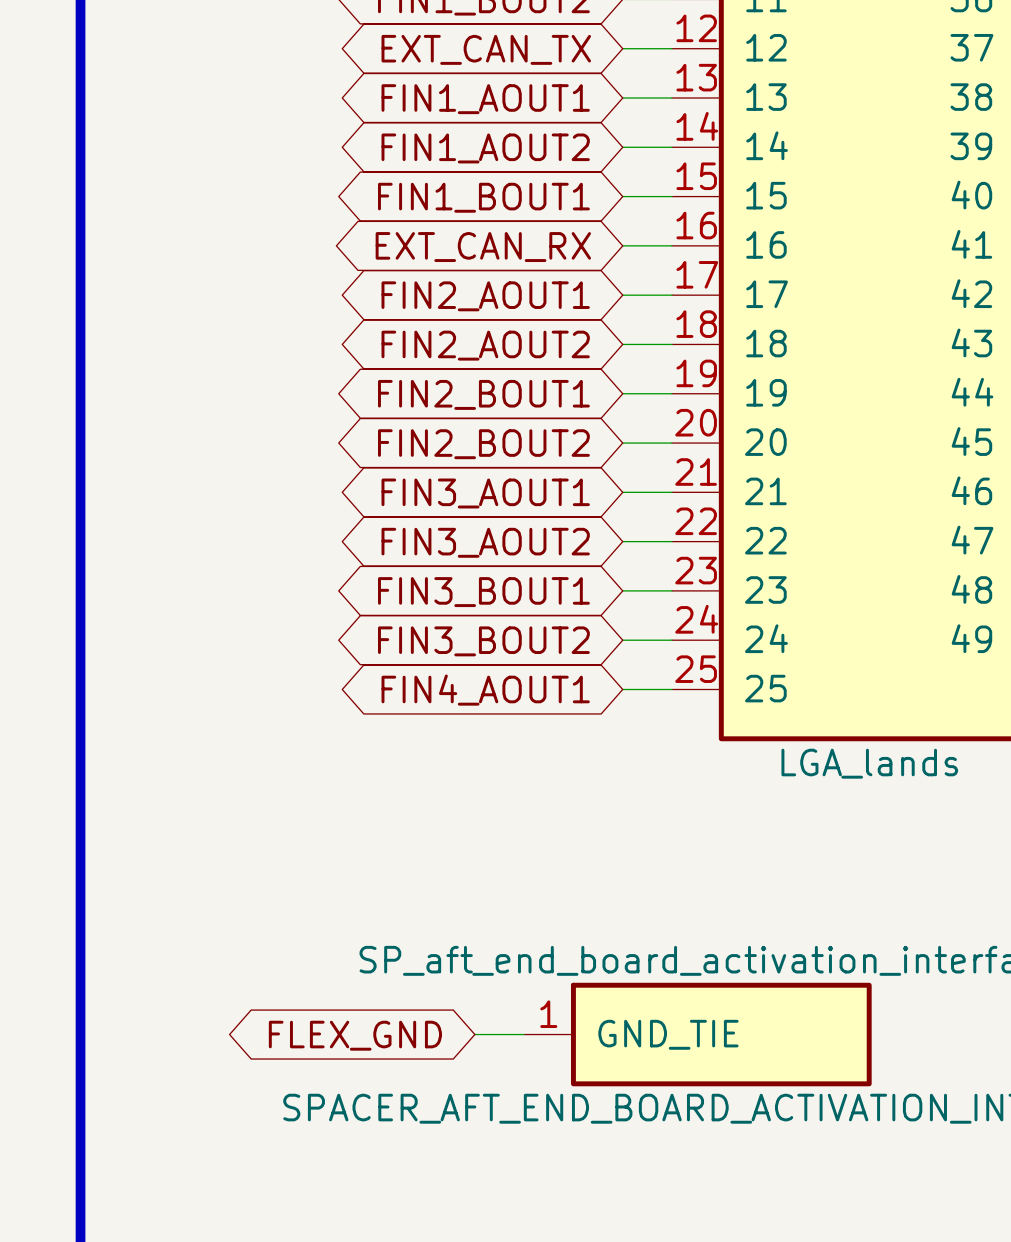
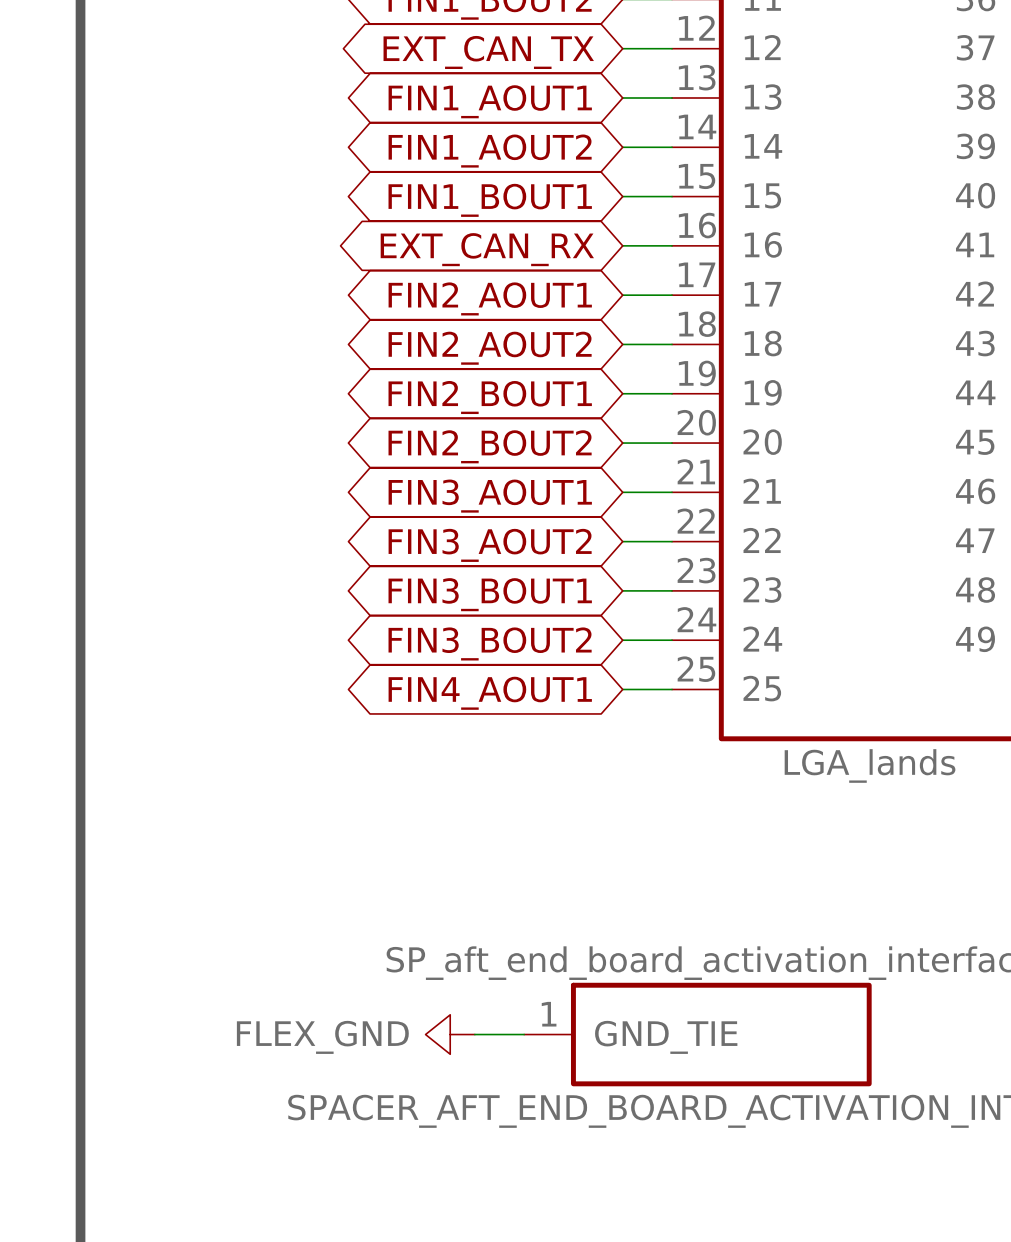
power symbol: none -> FLEX_GND (450, 1034)
global label: FLEX_GND (355, 1035) -> none

